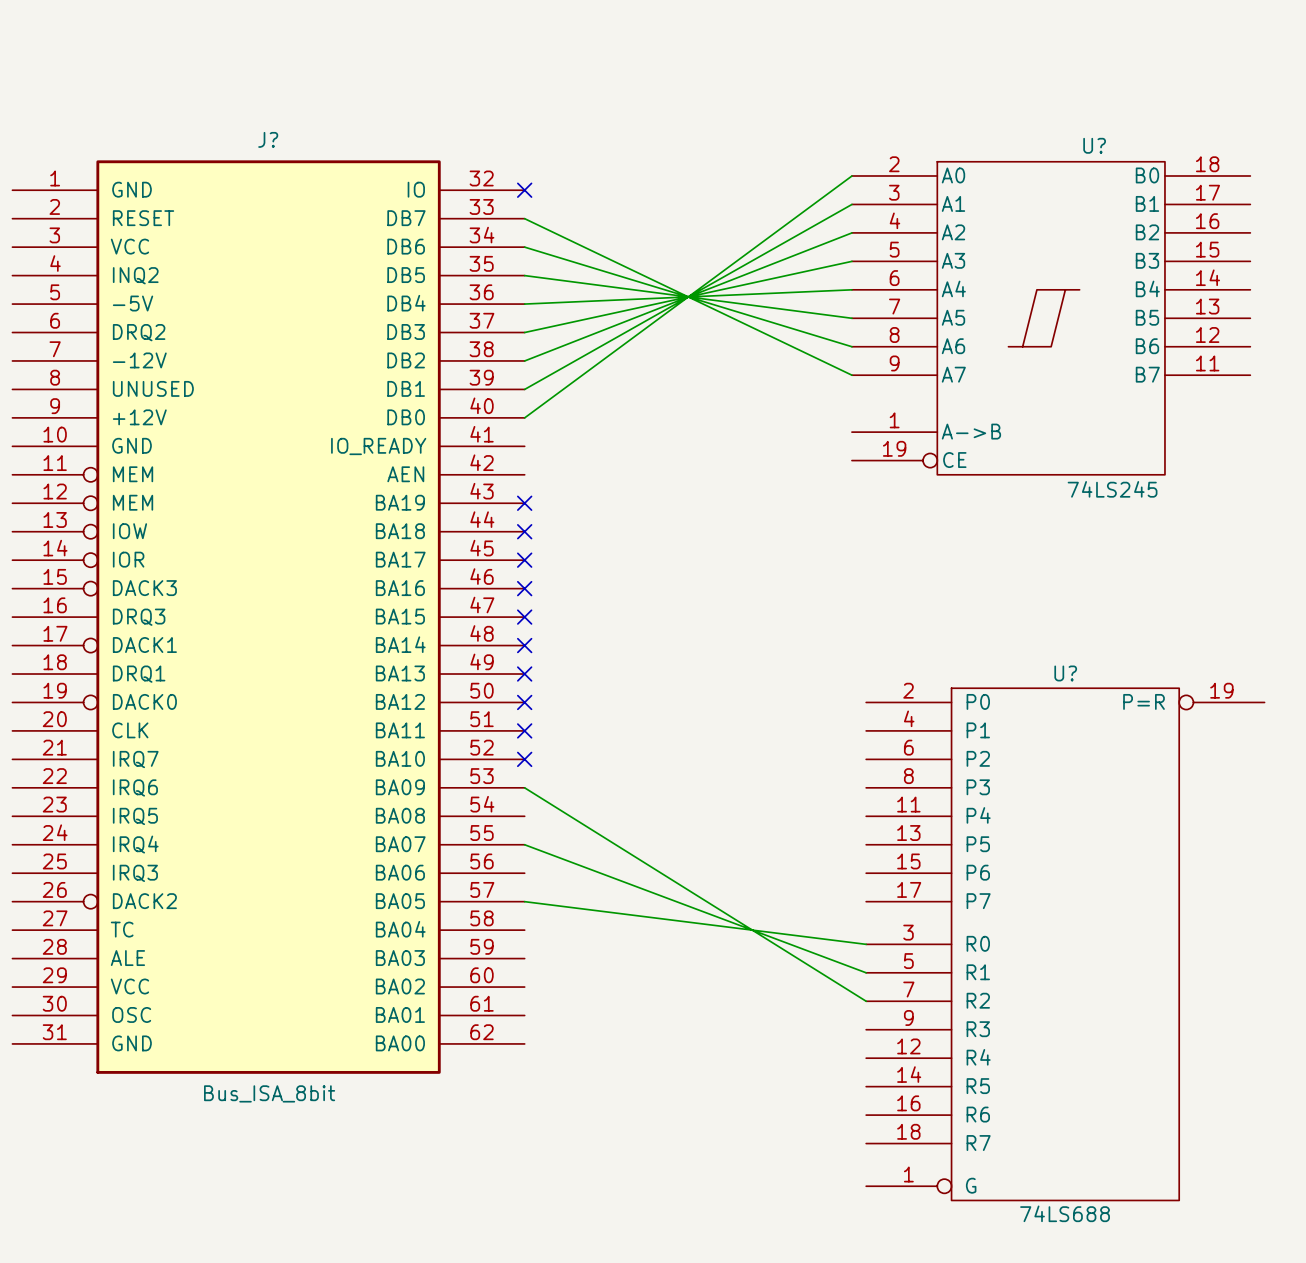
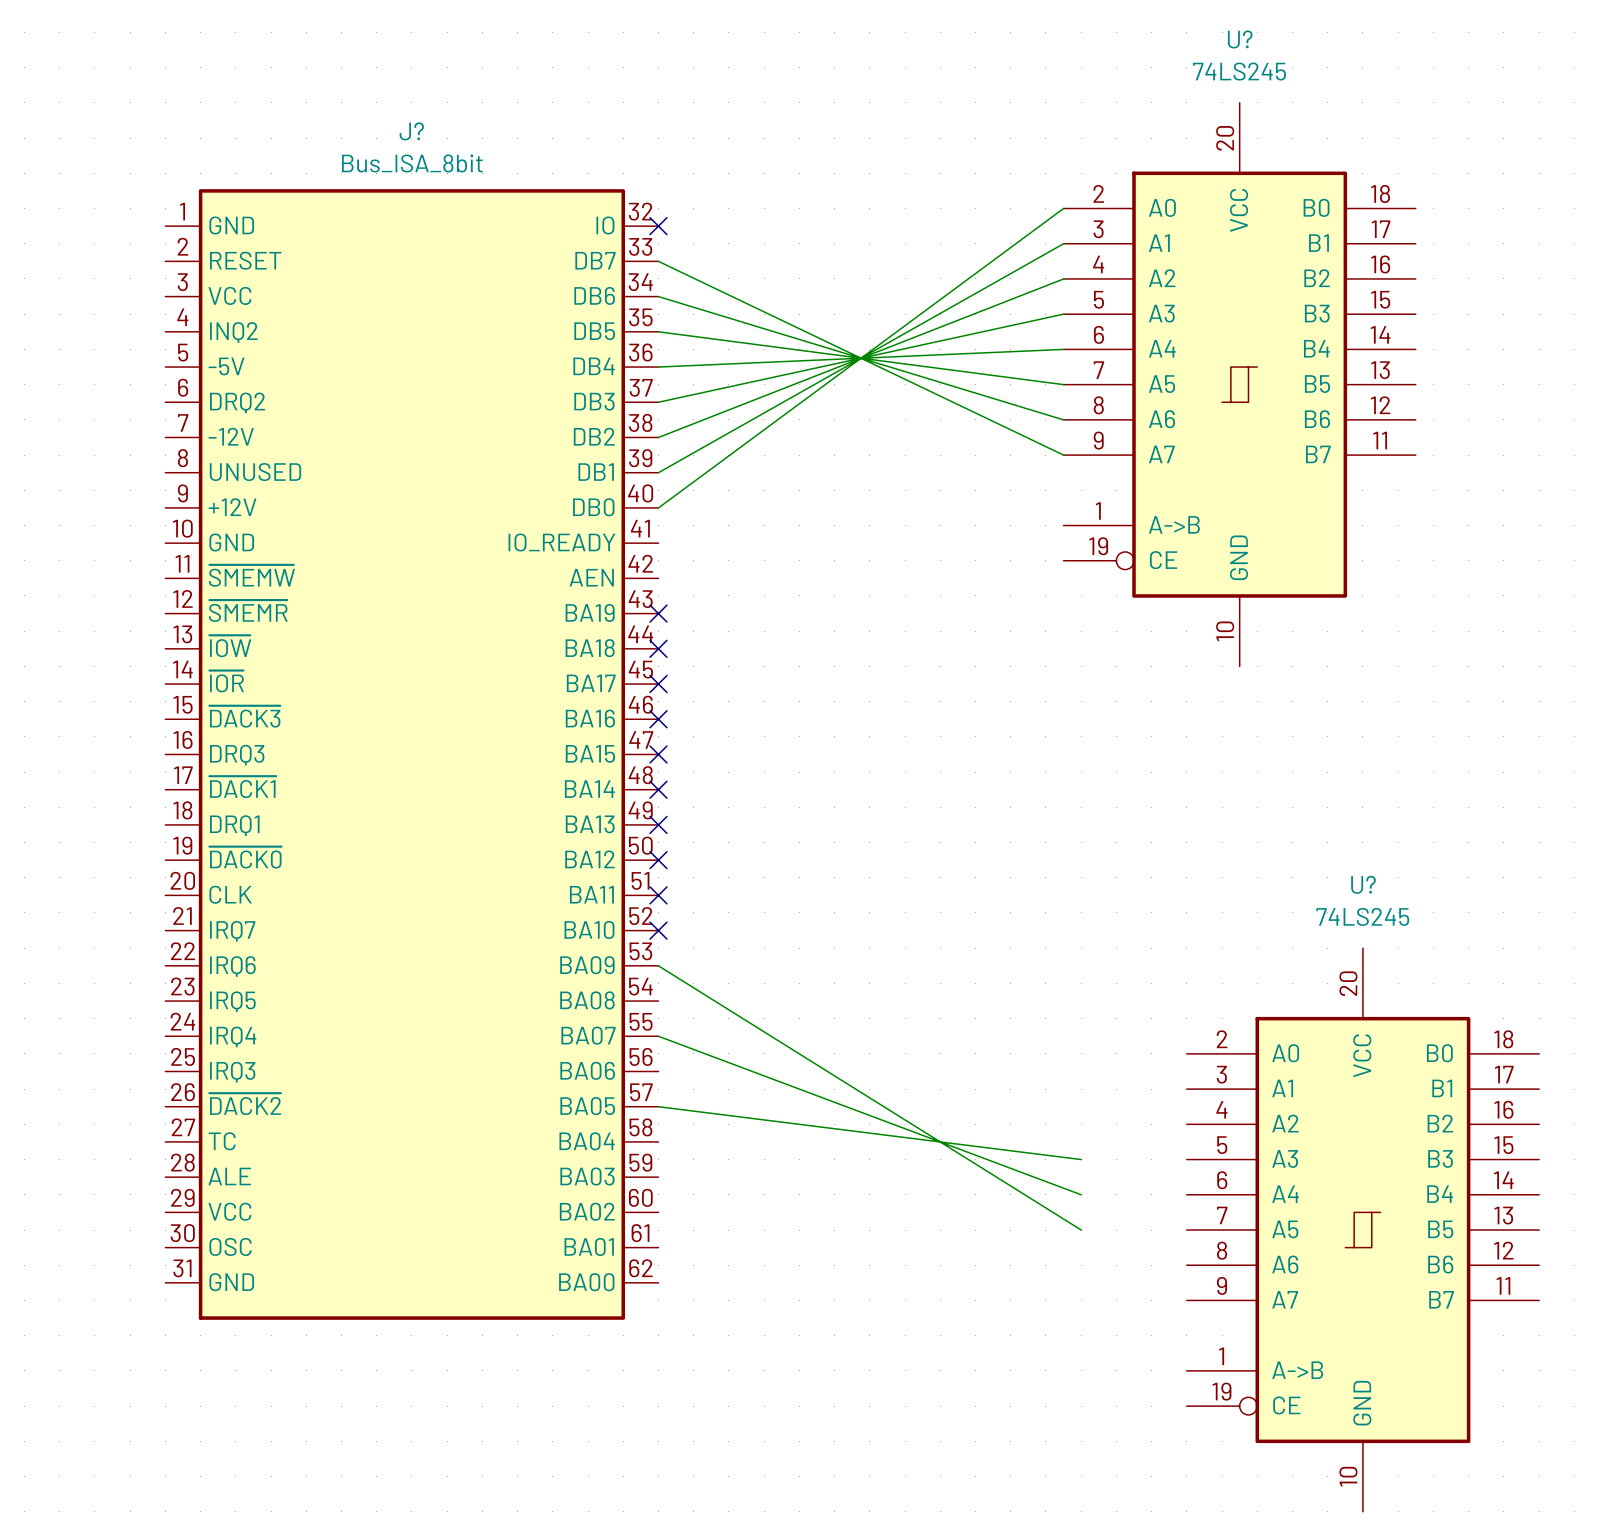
U?: none -> 74LS245 (1239, 384)
U?: 74LS245 (1051, 318) -> none
J?: Bus_ISA_8bit (268, 617) -> none
J?: none -> Bus_ISA_8bit (411, 754)
U?: 74LS688 (1065, 944) -> none
U?: none -> 74LS245 (1362, 1230)

